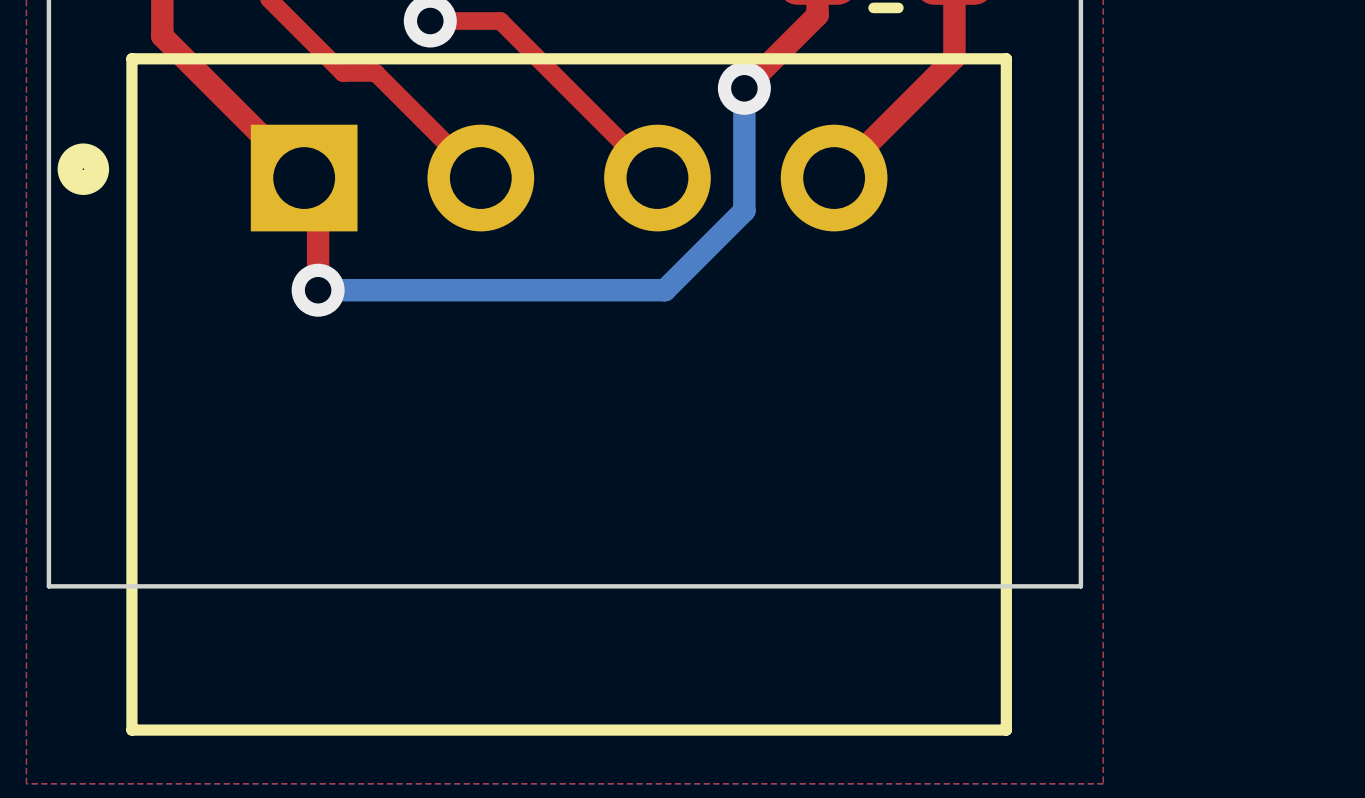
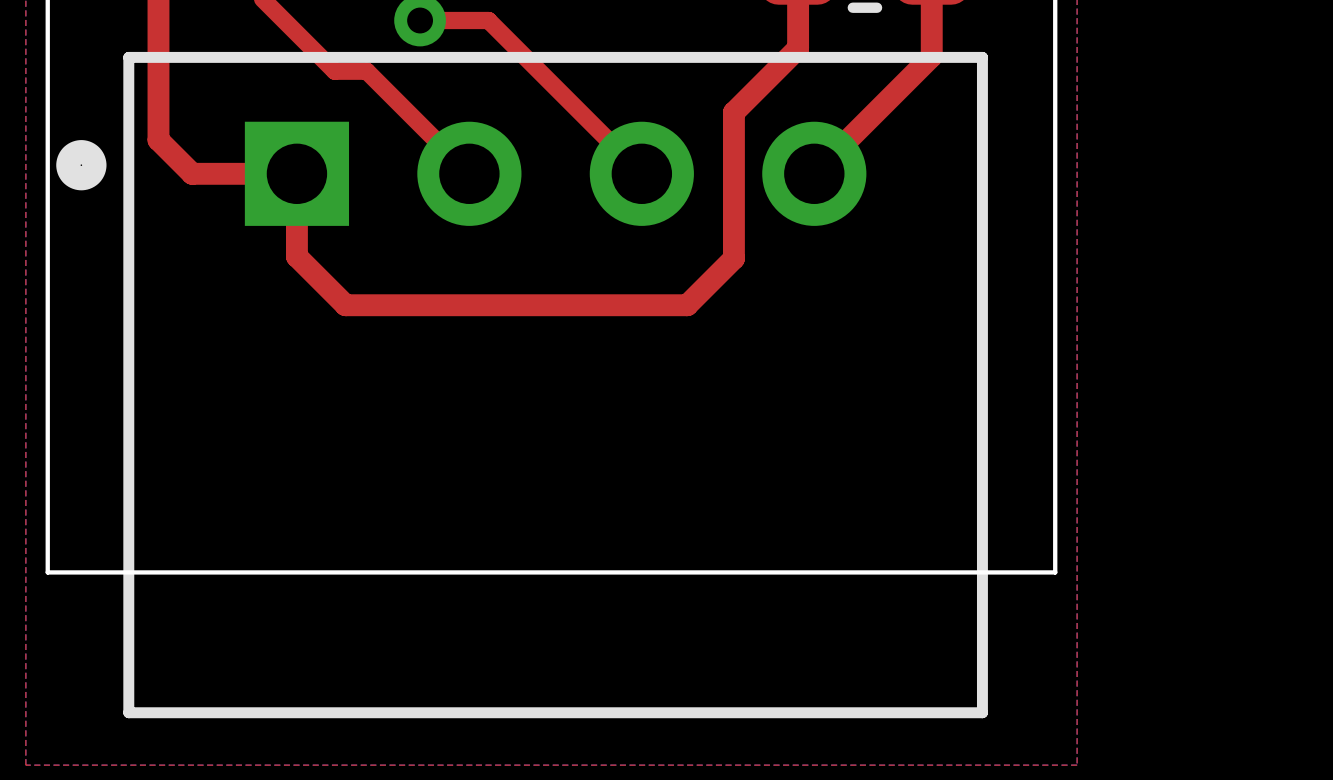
top track: (817, 15) (744, 88) -> none
top track: (162, 36) (318, 192) (318, 290) -> (158, 35) (158, 140) (192, 173) (296, 173) (296, 256) (345, 305) (687, 305) (733, 258) (733, 112) (798, 48) (798, 14)
bottom track: (744, 88) (744, 210) (664, 290) (318, 290) -> none
via: (744, 88) -> none
via: (318, 290) -> none

